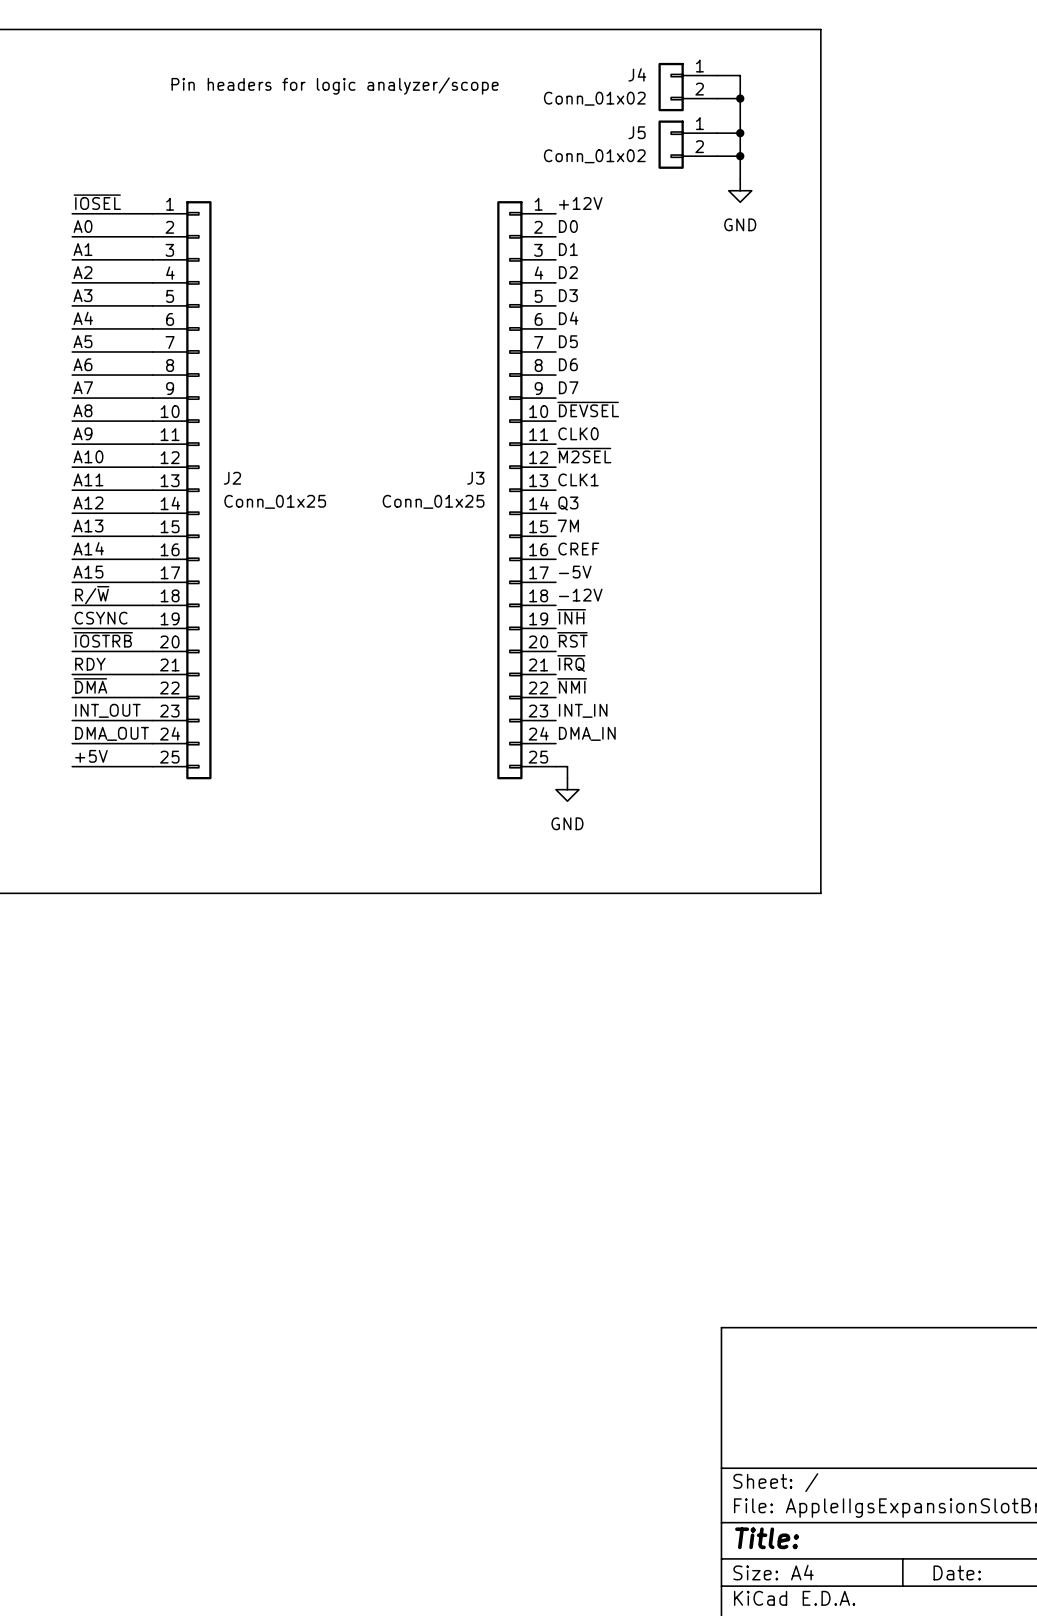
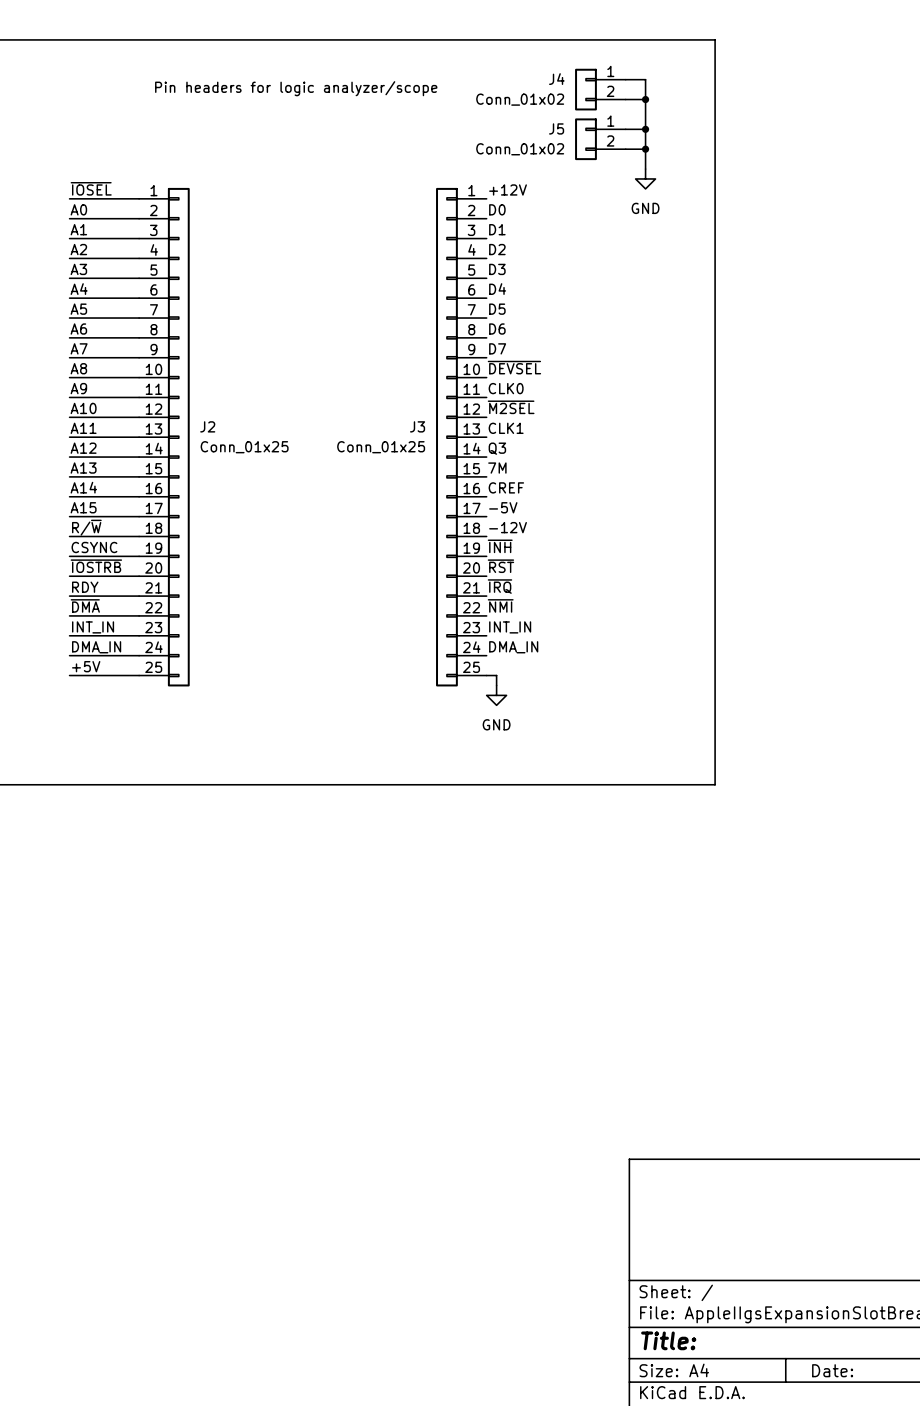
label: INT_OUT (107, 710) -> INT_IN (93, 627)
label: DMA_OUT (112, 733) -> DMA_IN (96, 647)

